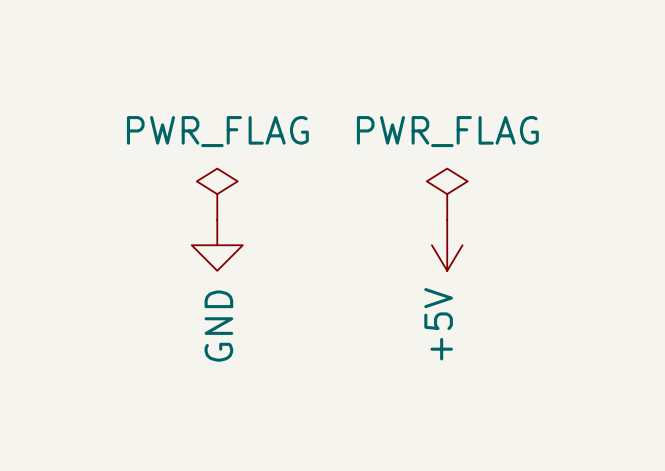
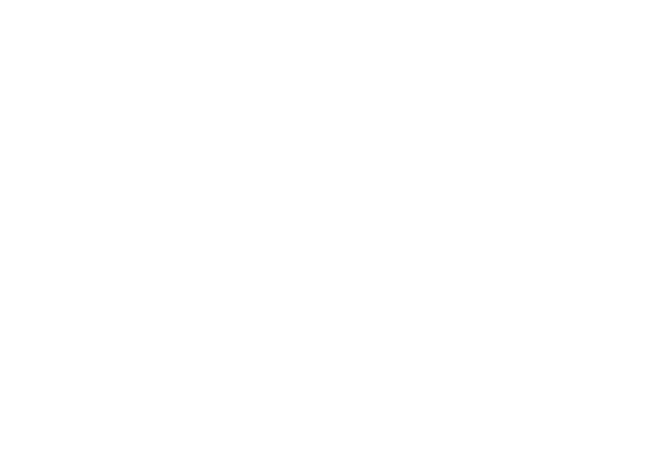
power symbol: PWR_FLAG (217, 194) -> none
power symbol: PWR_FLAG (447, 194) -> none
power symbol: GND (217, 245) -> none
power symbol: +5V (447, 245) -> none

